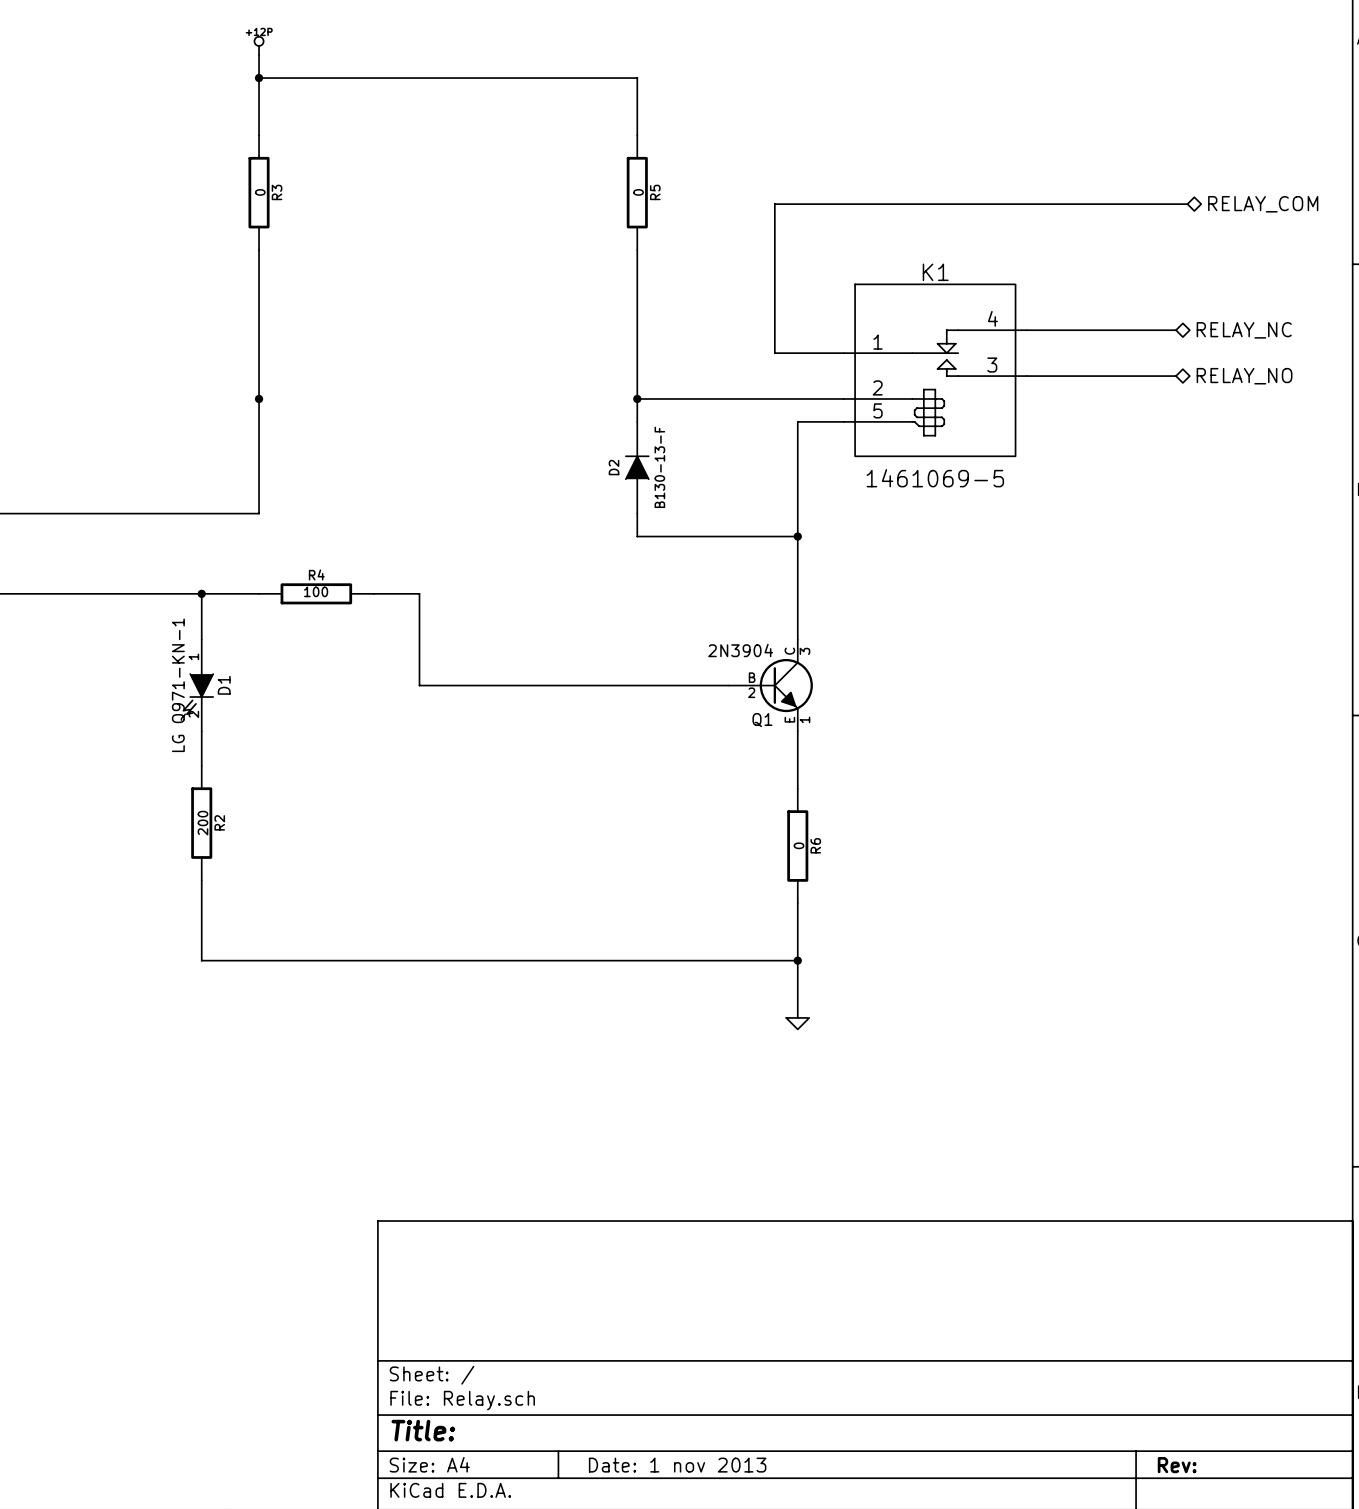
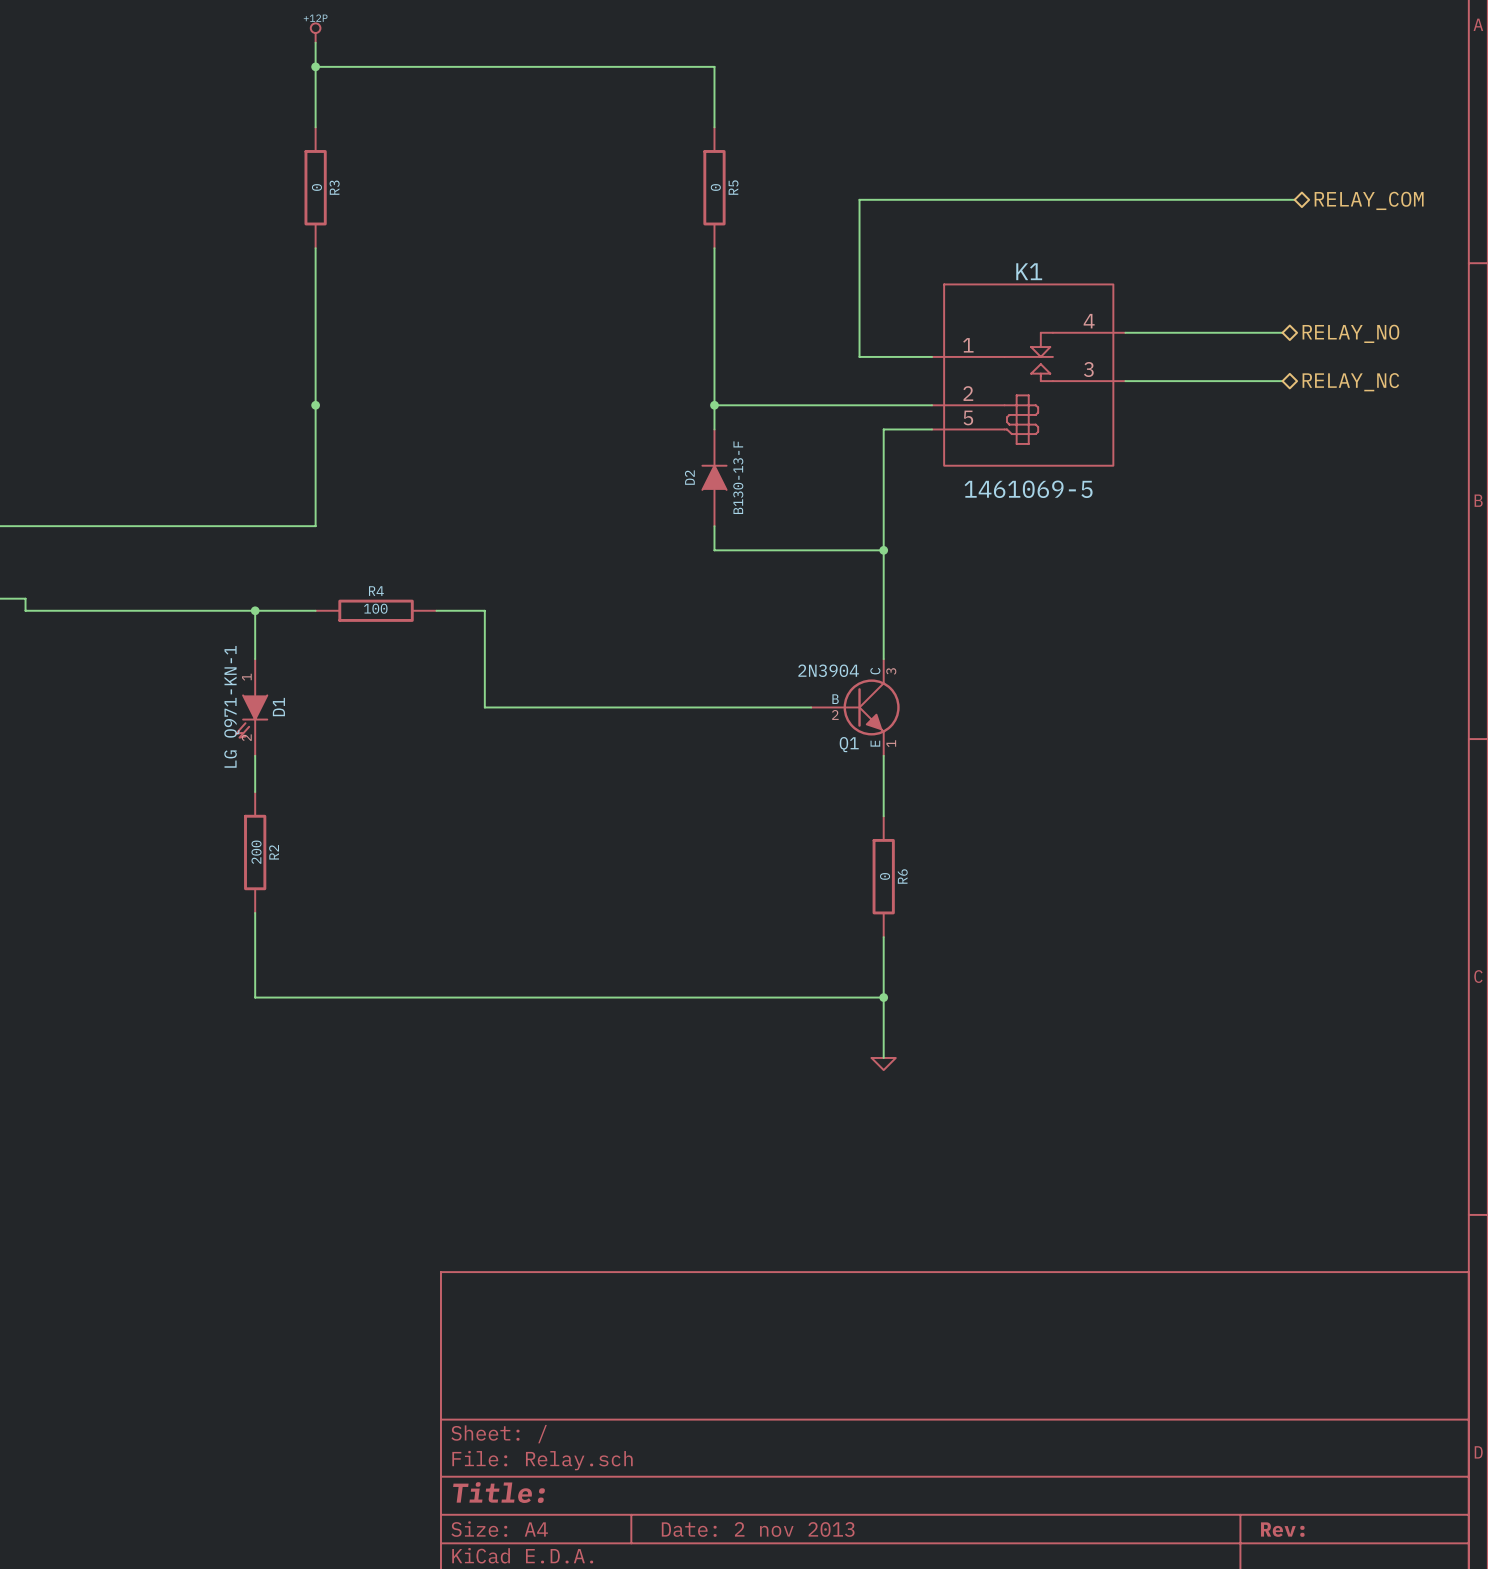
hierarchical label: RELAY_NC (1244, 330) -> RELAY_NO (1350, 333)
hierarchical label: RELAY_NO (1244, 376) -> RELAY_NC (1350, 382)
title block: Date: 1 nov 2013 (677, 1465) -> Date: 2 nov 2013 (758, 1529)

